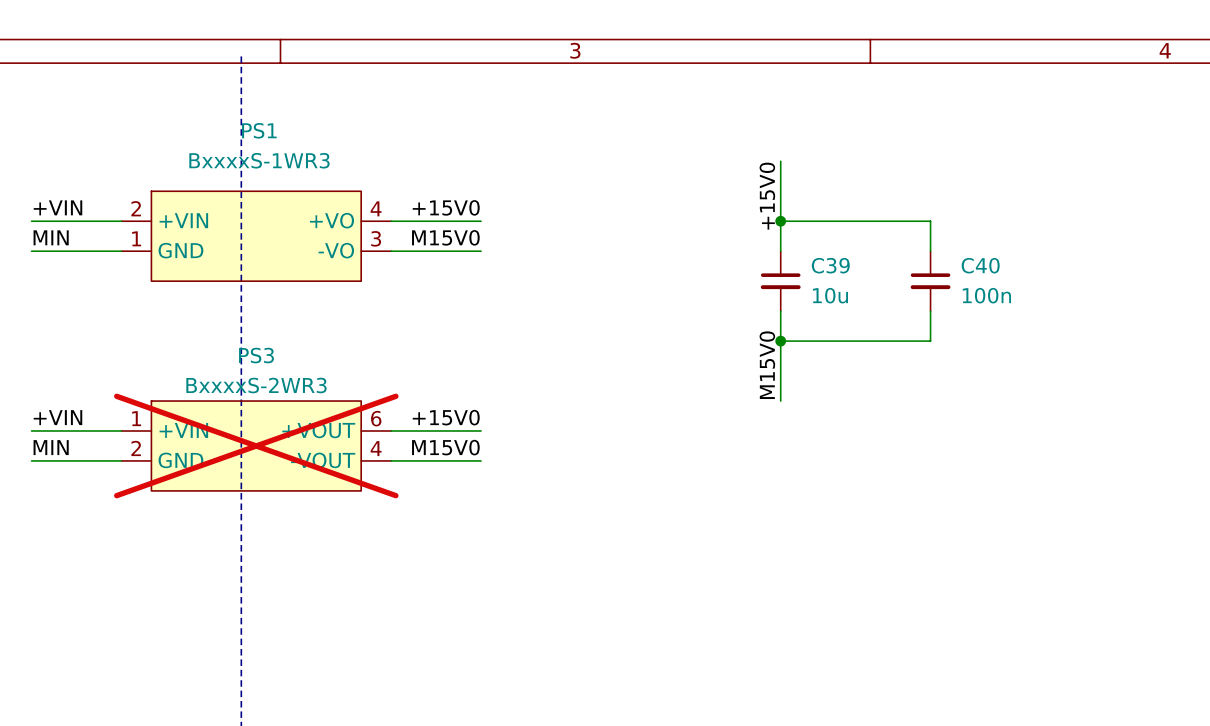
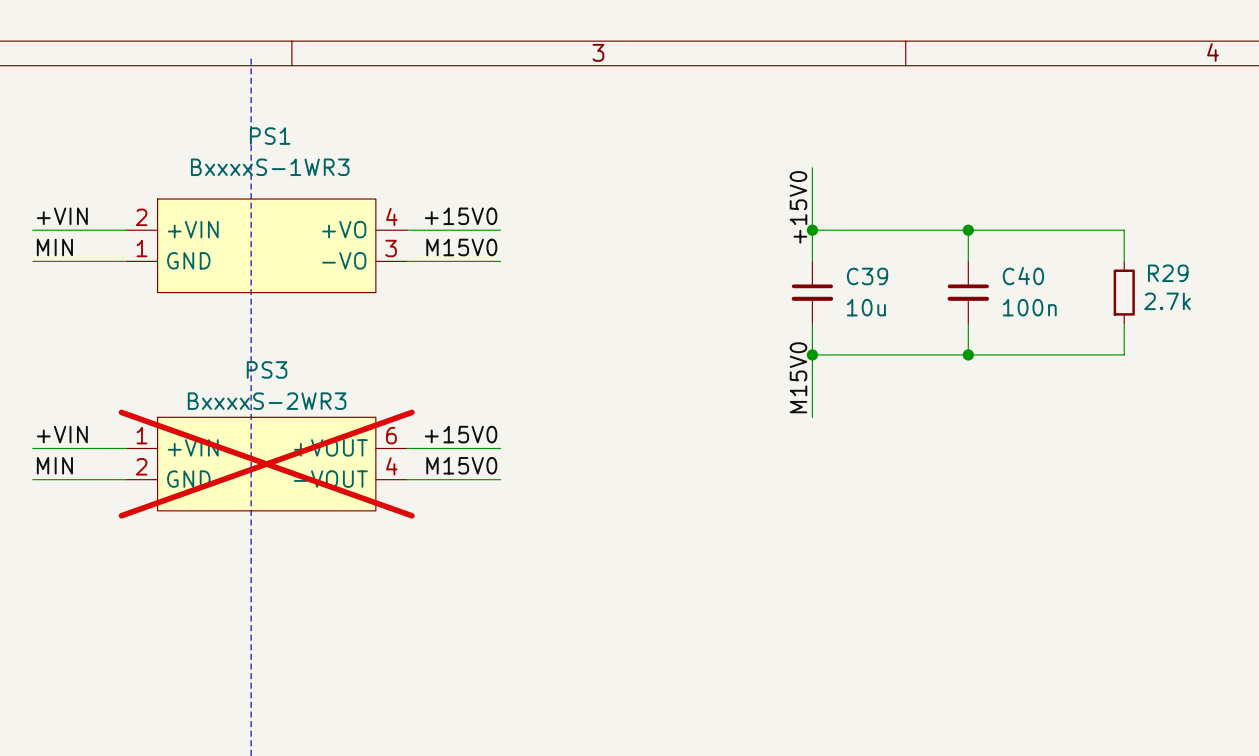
wire: none -> (968, 230) (1124, 230) (1124, 261)
junction: none -> (968, 230)
R29: none -> 2.7k (1124, 292)
wire: none -> (1124, 323) (1124, 354) (968, 354)
junction: none -> (968, 354)

